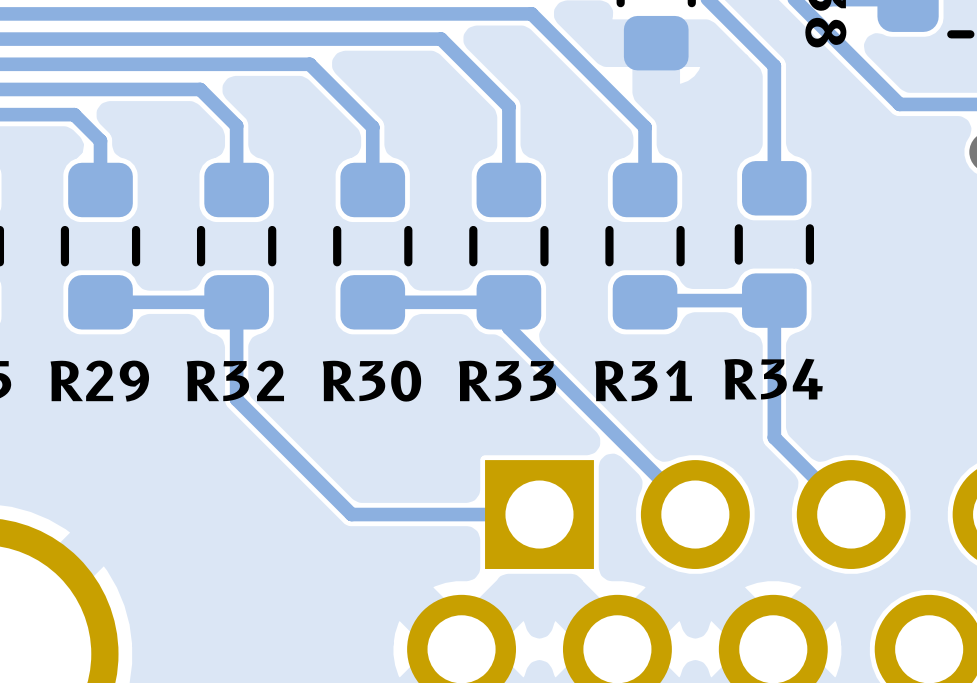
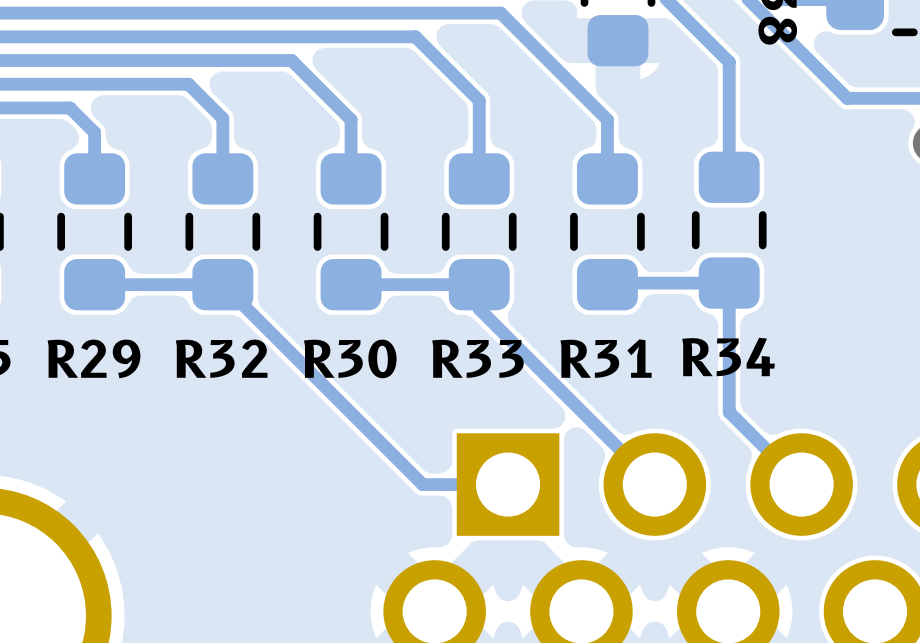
track: (236, 302) (236, 399) (351, 514) (448, 514) -> (222, 284) (422, 484)

